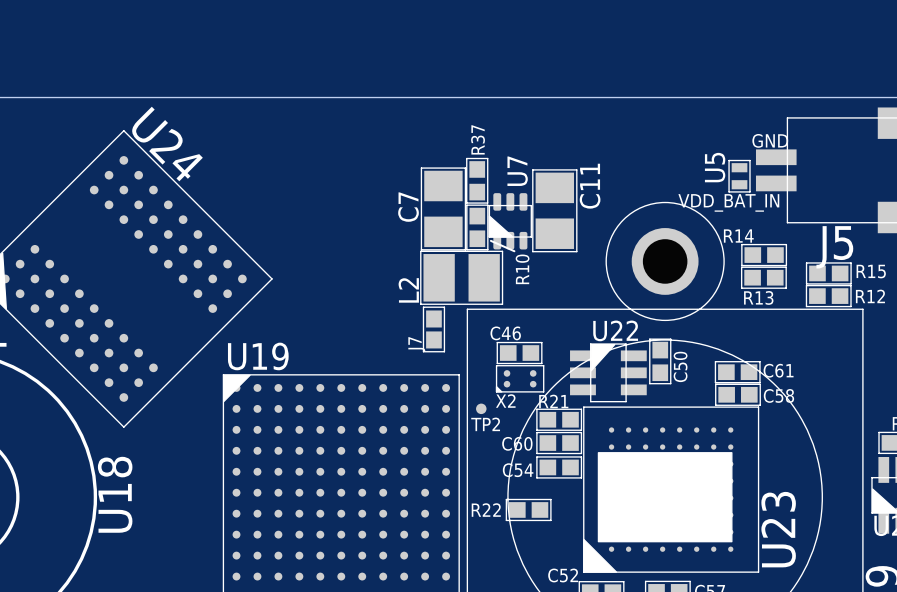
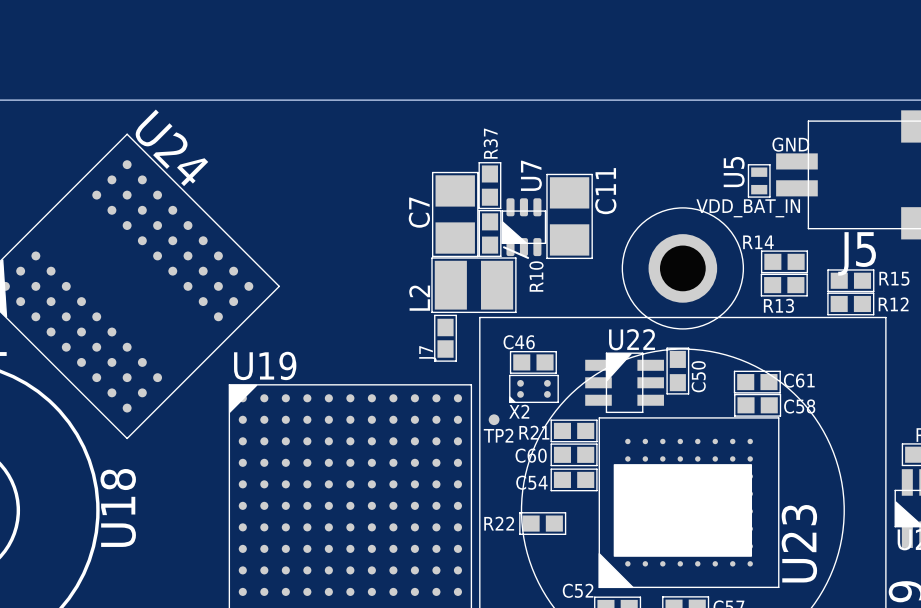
R21 name position: R21 (553, 401) -> R21 (534, 432)

